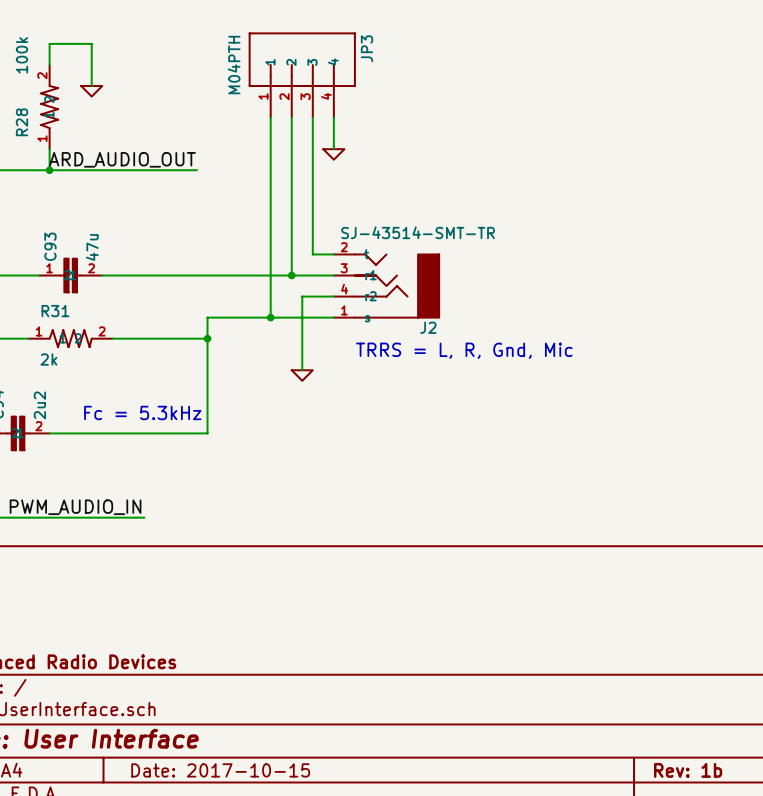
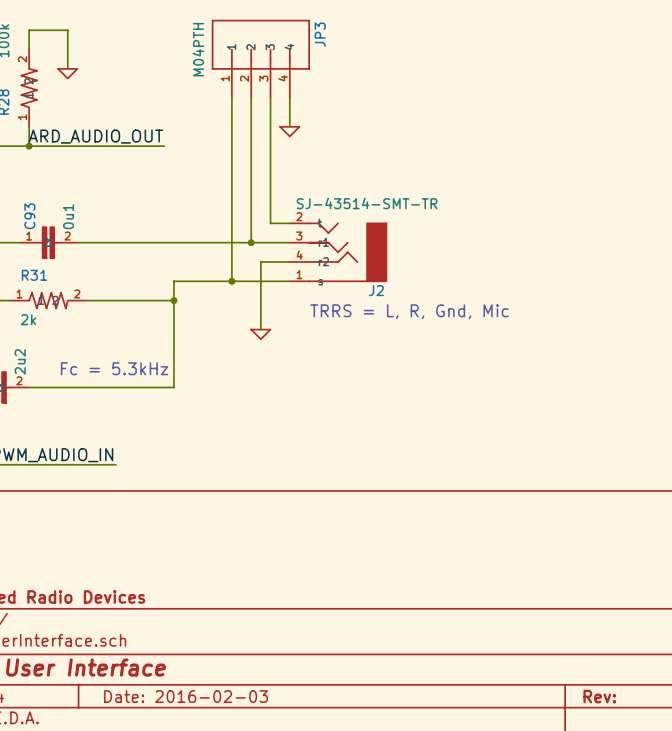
C93 value: 47u (92, 247) -> 0u1 (68, 216)
title block: Date: 2017-10-15 (220, 770) -> Date: 2016-02-03 (186, 696)
title block: Rev: 1b (688, 770) -> Rev: (599, 696)

